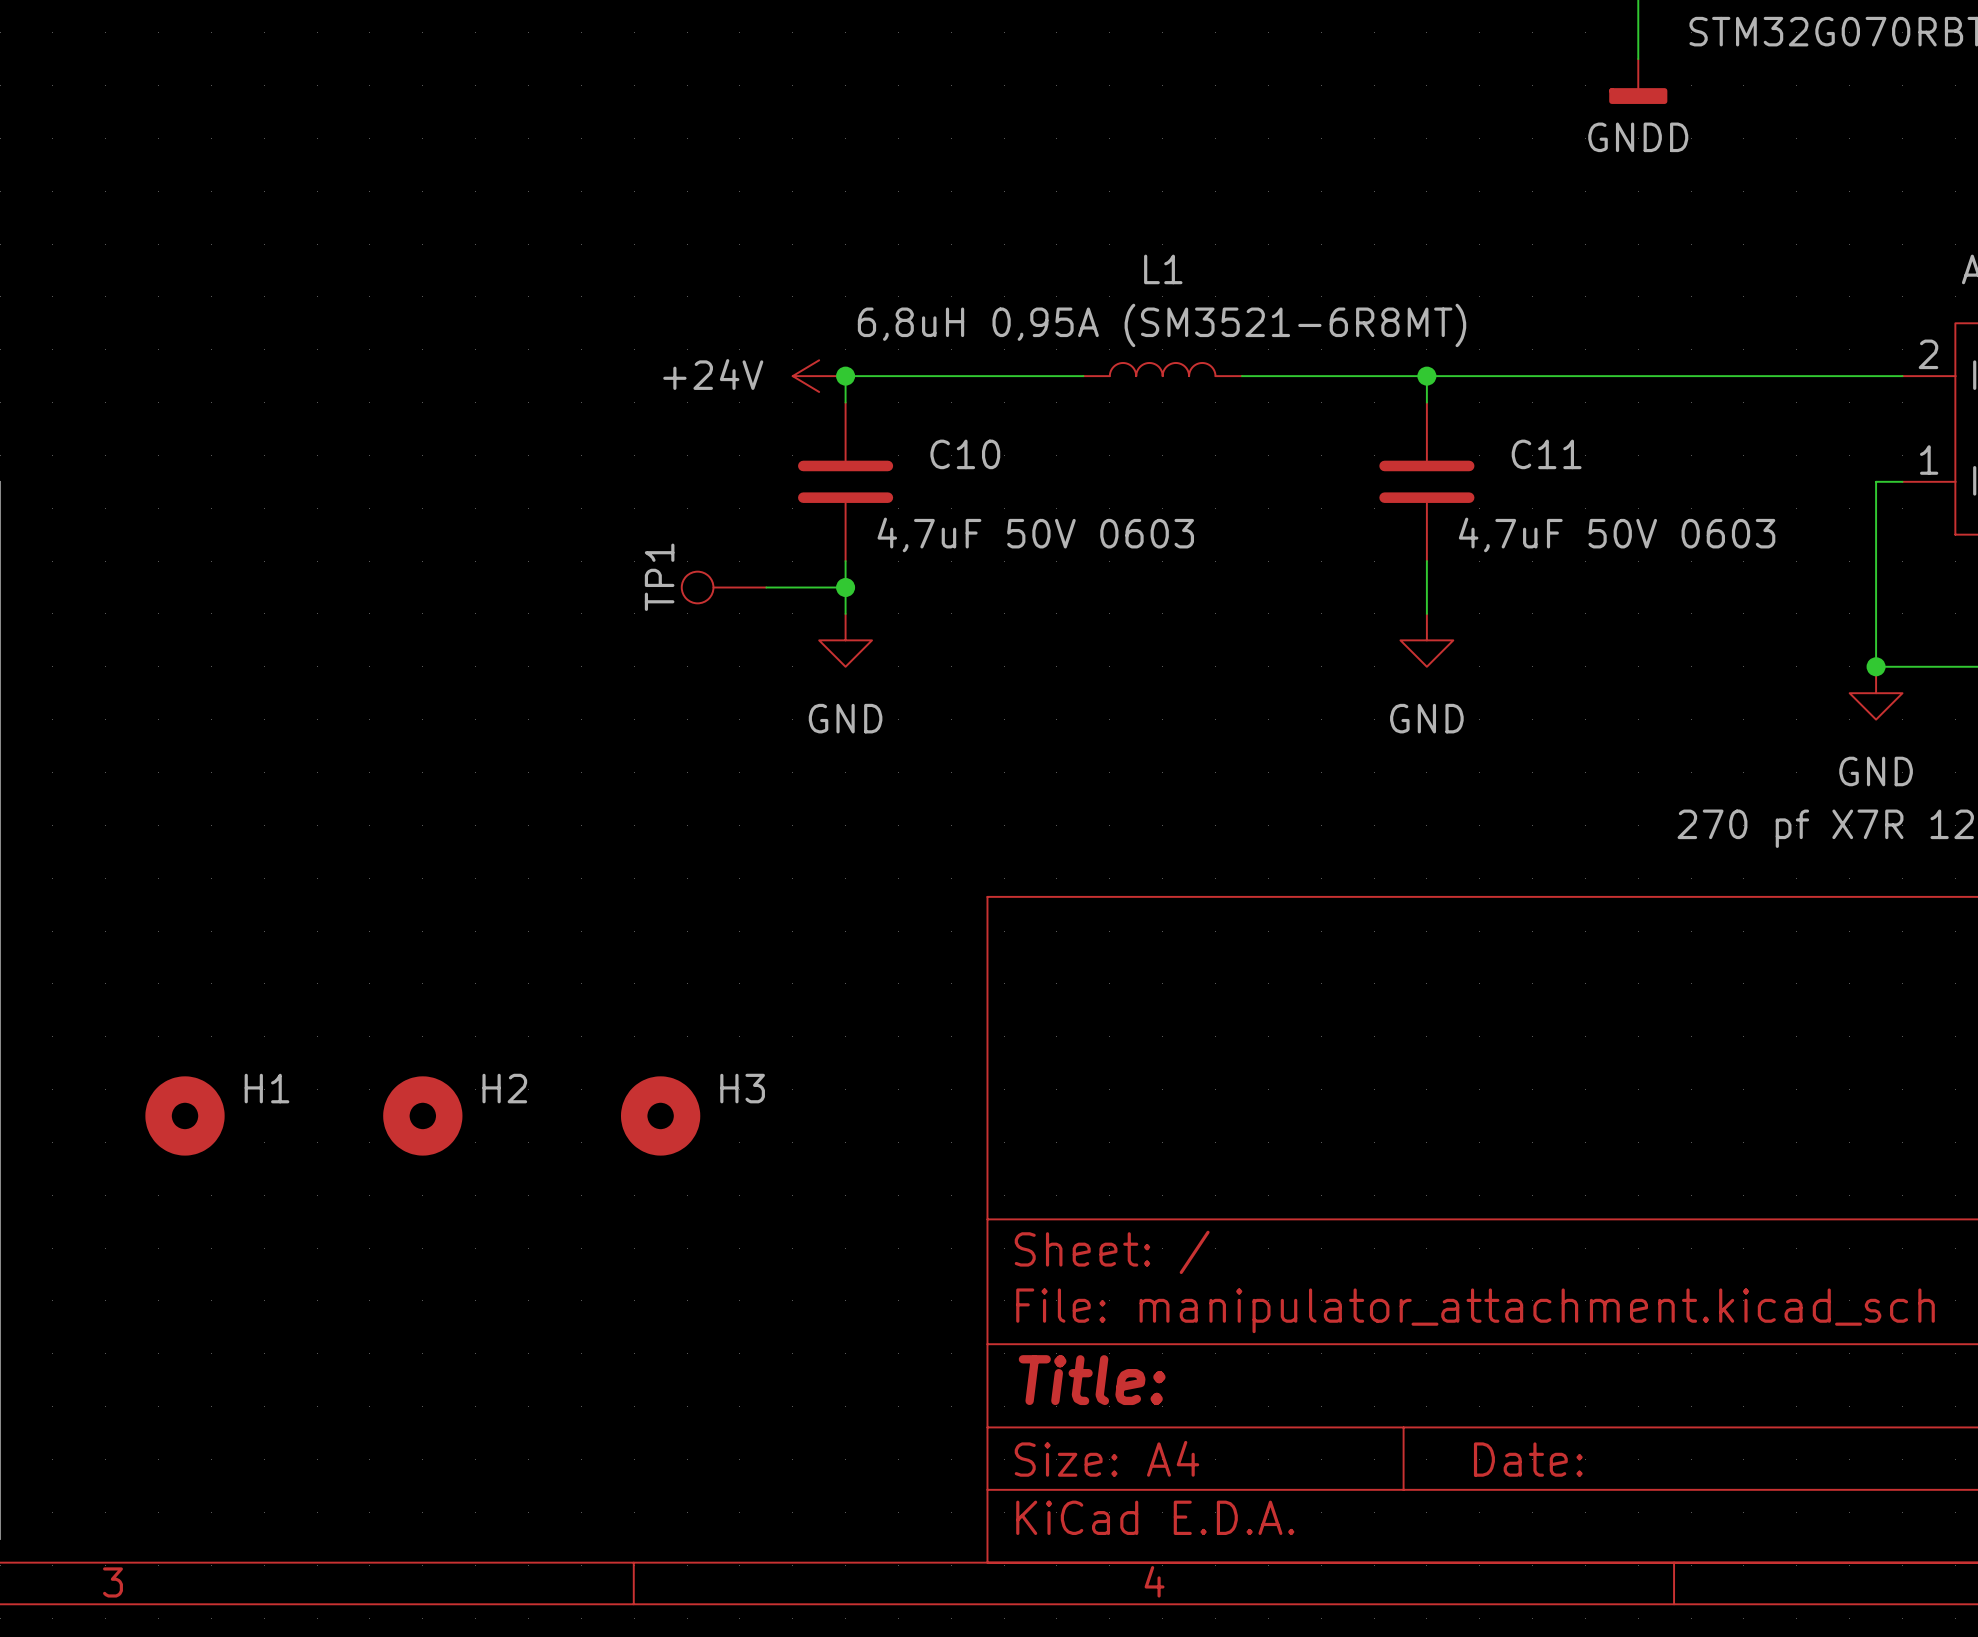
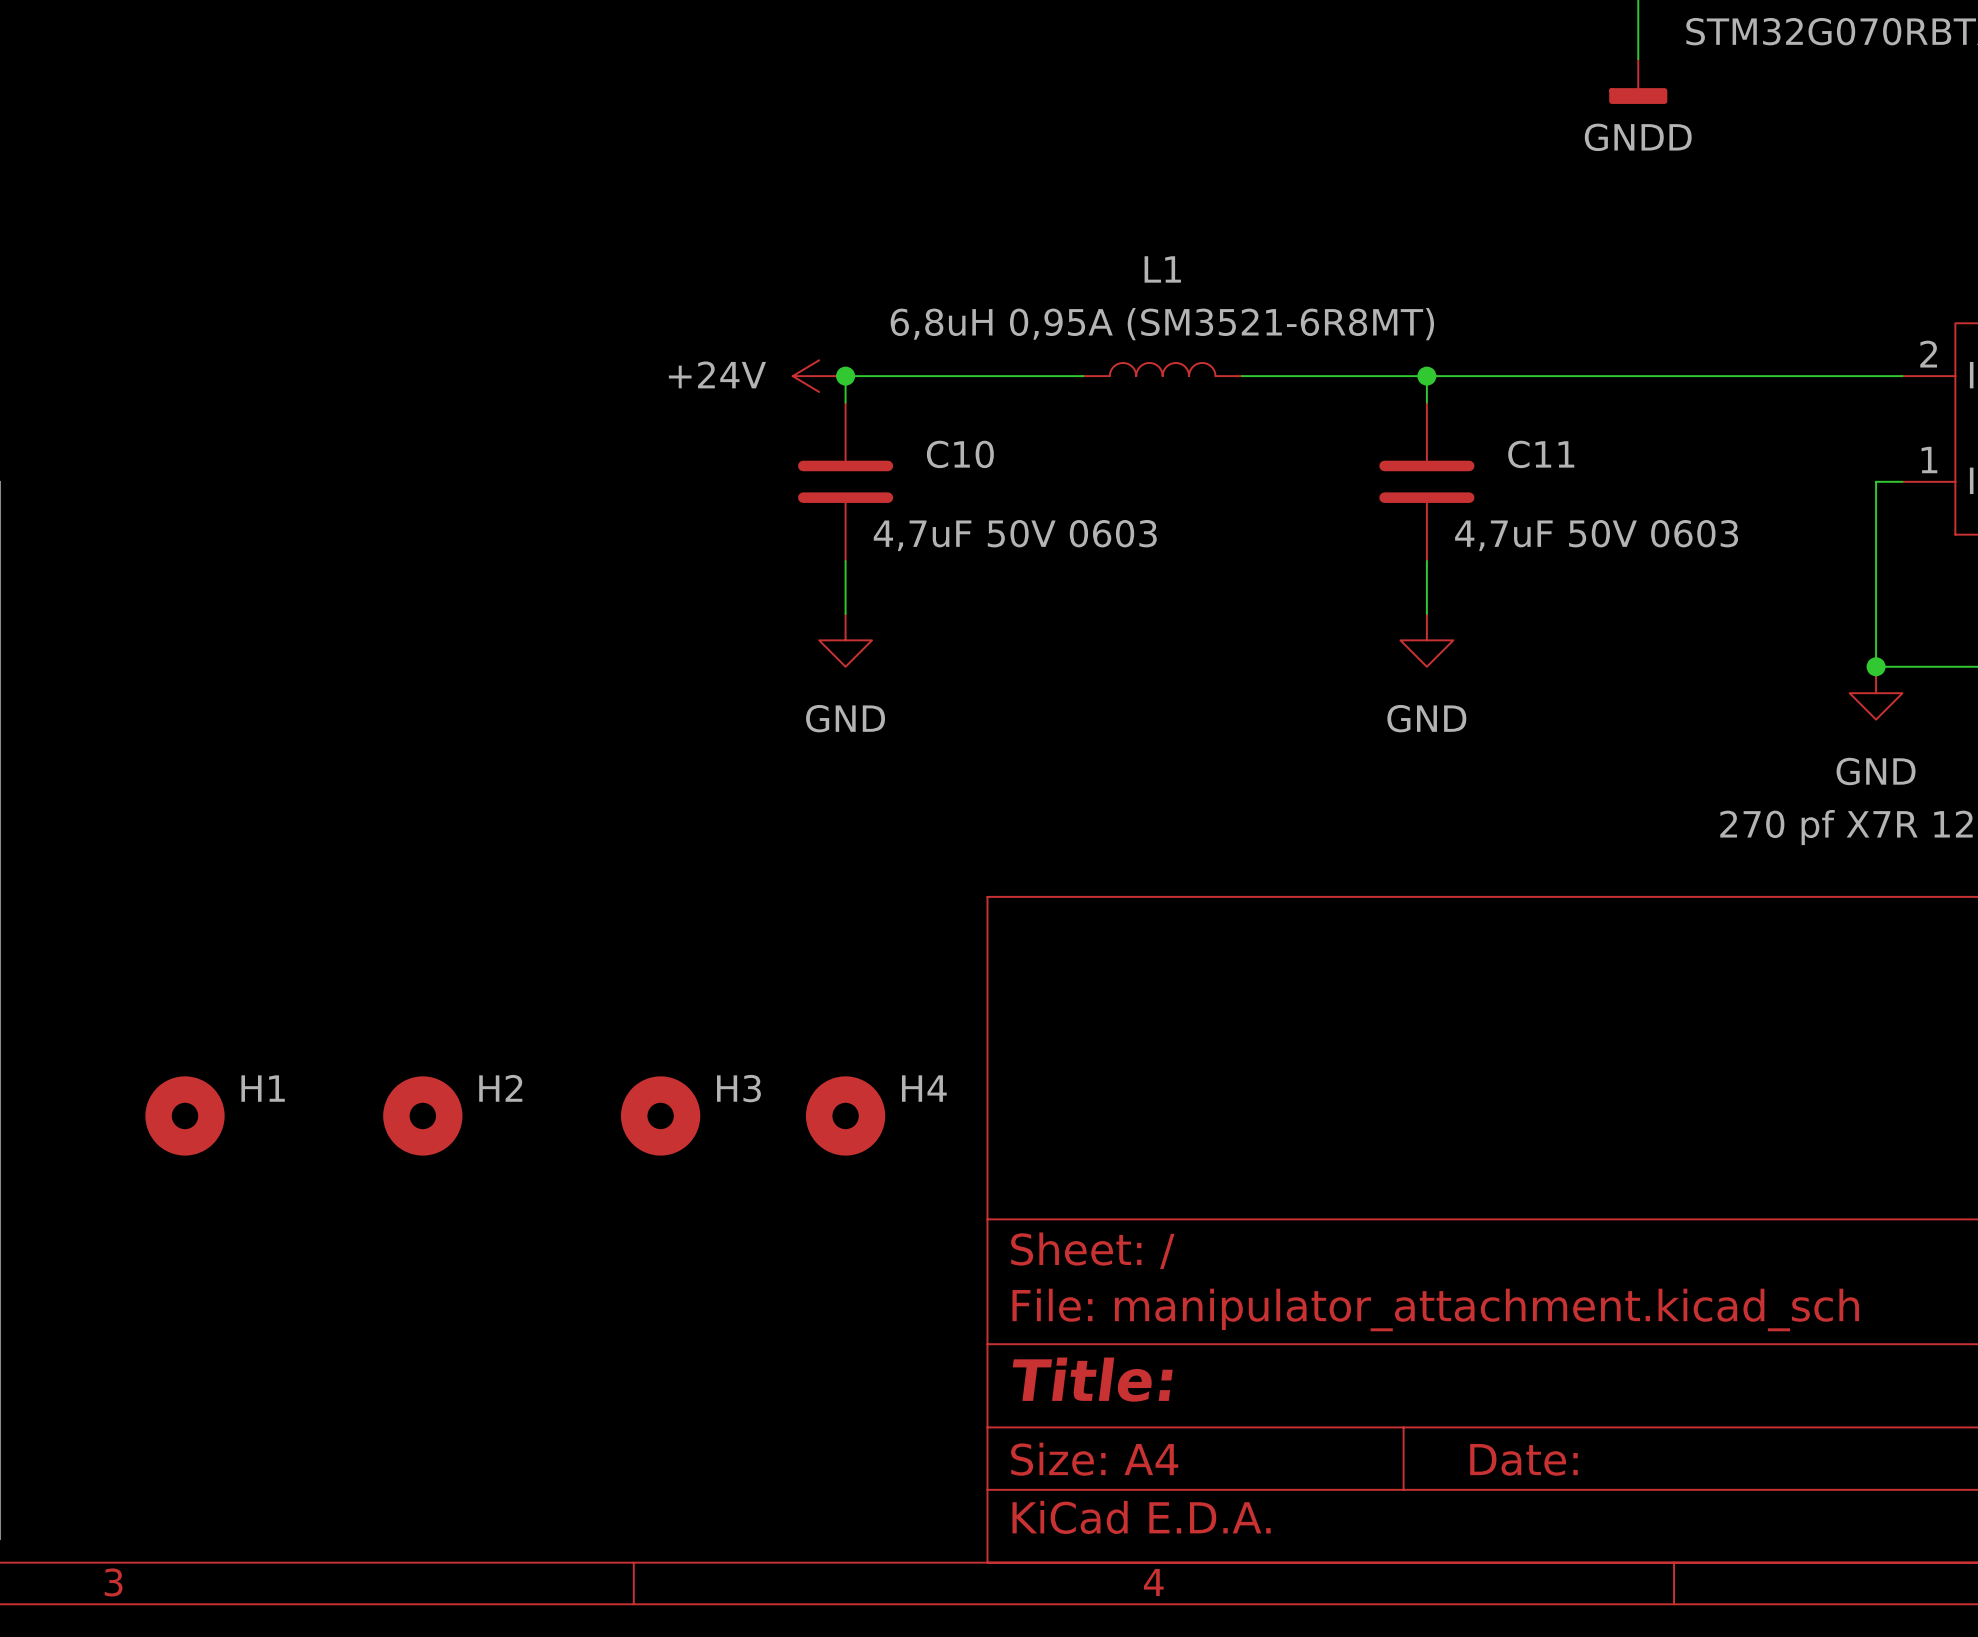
TP1: (724, 587) -> none
wire: (766, 587) (845, 587) -> none
junction: (845, 587) -> none
H4: none -> (845, 1115)

